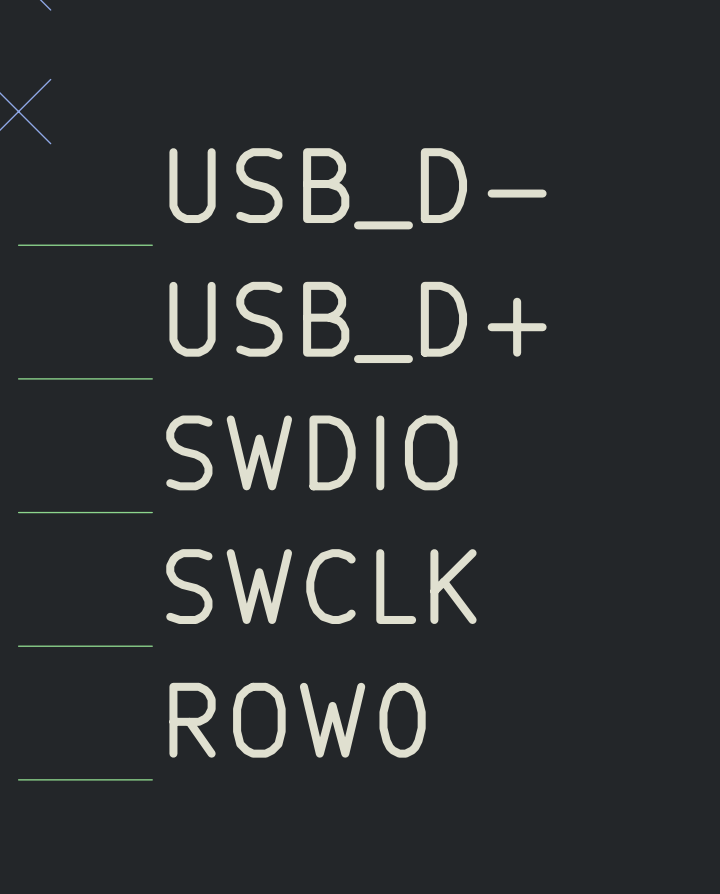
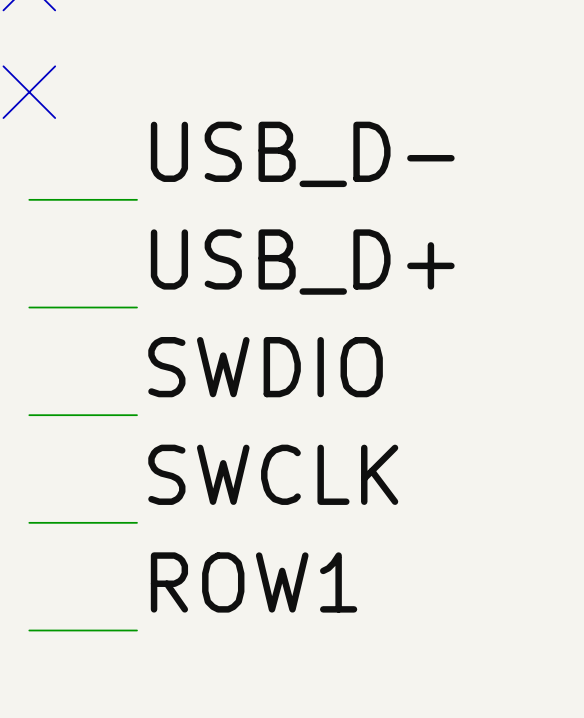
label: ROW0 (297, 720) -> ROW1 (254, 582)

